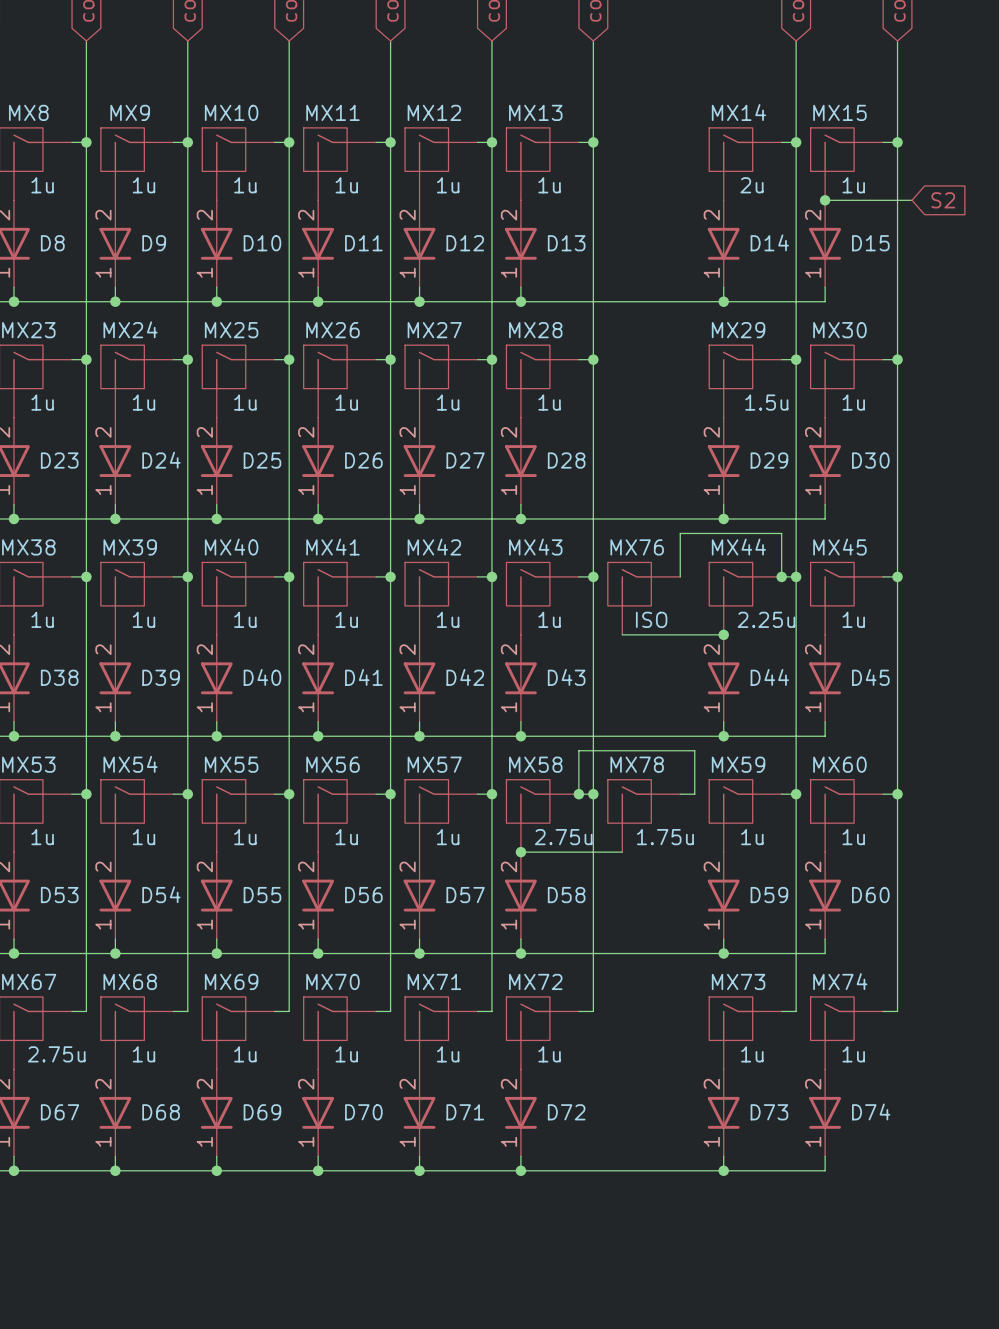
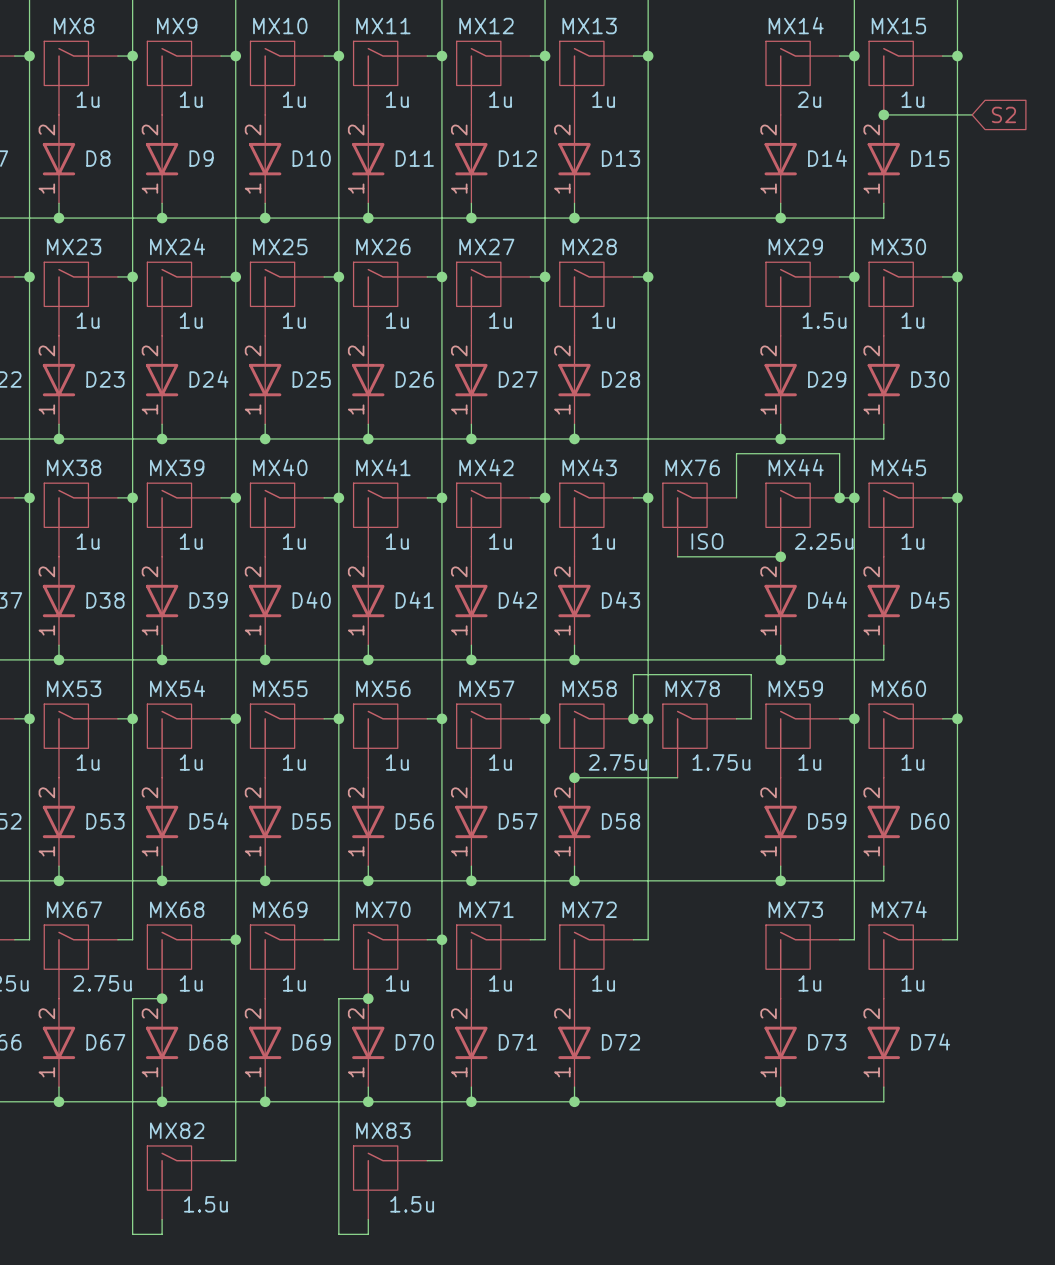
wire: none -> (235, 939) (235, 1160) (221, 1160)
junction: none -> (235, 939)
wire: none -> (441, 939) (441, 1160) (427, 1160)
junction: none -> (441, 939)
wire: none -> (162, 998) (132, 998) (132, 1234) (162, 1234) (162, 1219)
junction: none -> (162, 998)
wire: none -> (368, 998) (338, 998) (338, 1234) (368, 1234) (368, 1219)
junction: none -> (368, 998)
MX82: none -> (184, 1182)
MX83: none -> (390, 1182)

